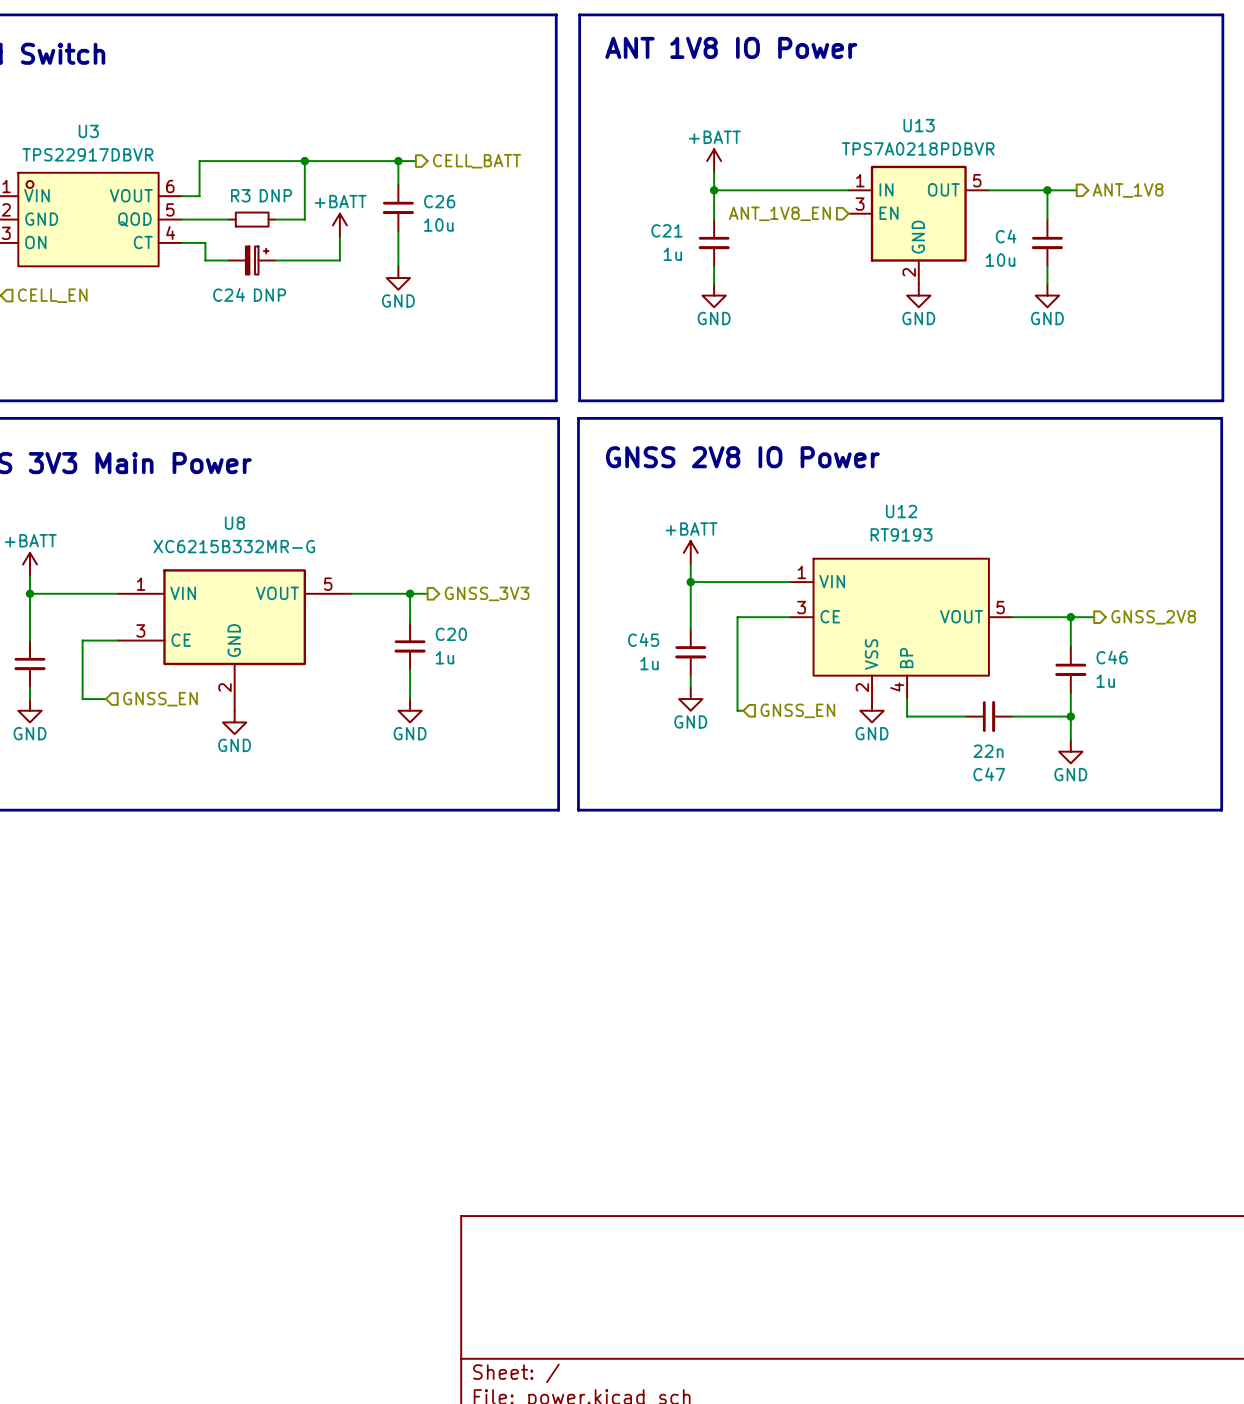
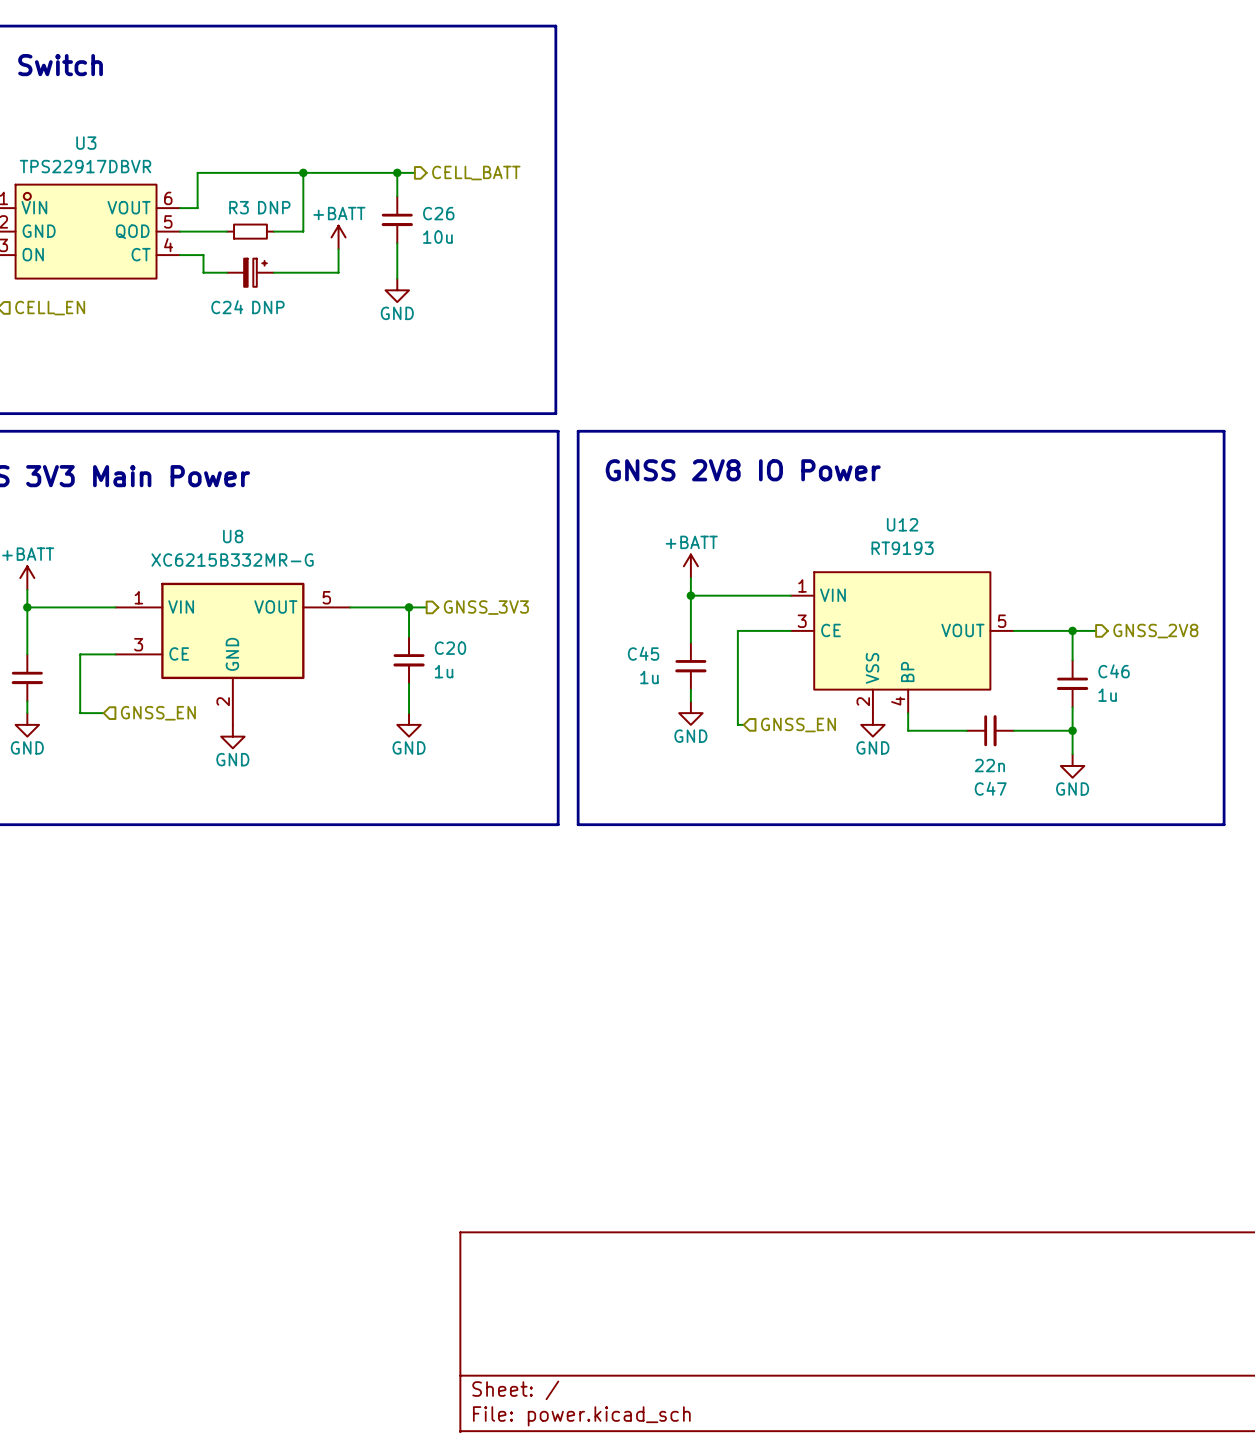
line: (579, 14) (1222, 14) (1222, 400) (579, 400) (579, 14) -> none
text: ANT 1V8 IO Power (731, 47) -> none
power symbol: +BATT (714, 161) -> none
wire: (714, 172) (714, 219) -> none
wire: (714, 190) (848, 190) -> none
junction: (714, 190) -> none
wire: (988, 190) (1076, 190) -> none
wire: (1047, 190) (1047, 219) -> none
junction: (1047, 190) -> none
hierarchical label: ANT_1V8 (1128, 190) -> none
hierarchical label: ANT_1V8_EN (779, 213) -> none
U13: TPS7A0218PDBVR (918, 224) -> none
C21: 1u (714, 242) -> none
C4: 10u (1047, 242) -> none
wire: (714, 266) (714, 283) -> none
wire: (1047, 266) (1047, 283) -> none
power symbol: GND (714, 295) -> none
power symbol: GND (918, 295) -> none
power symbol: GND (1047, 295) -> none

